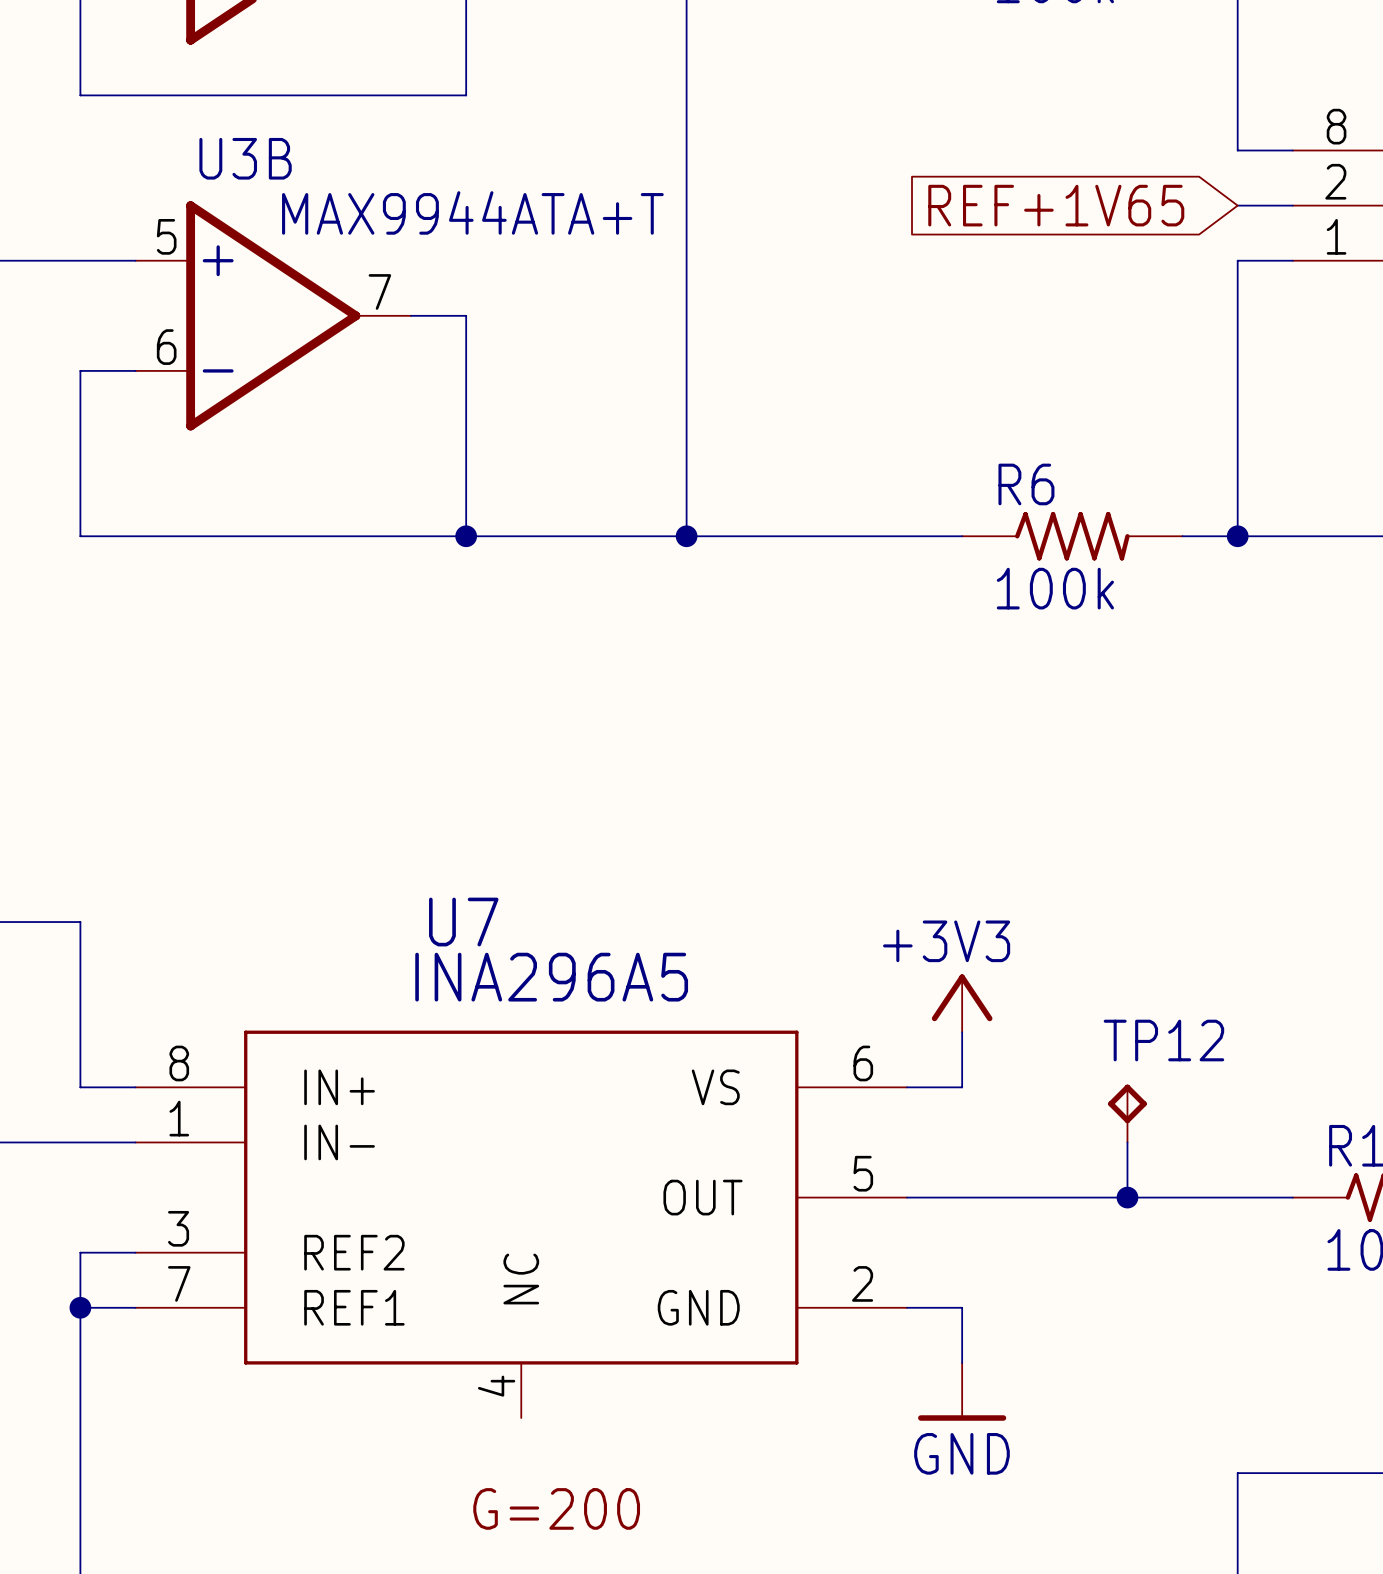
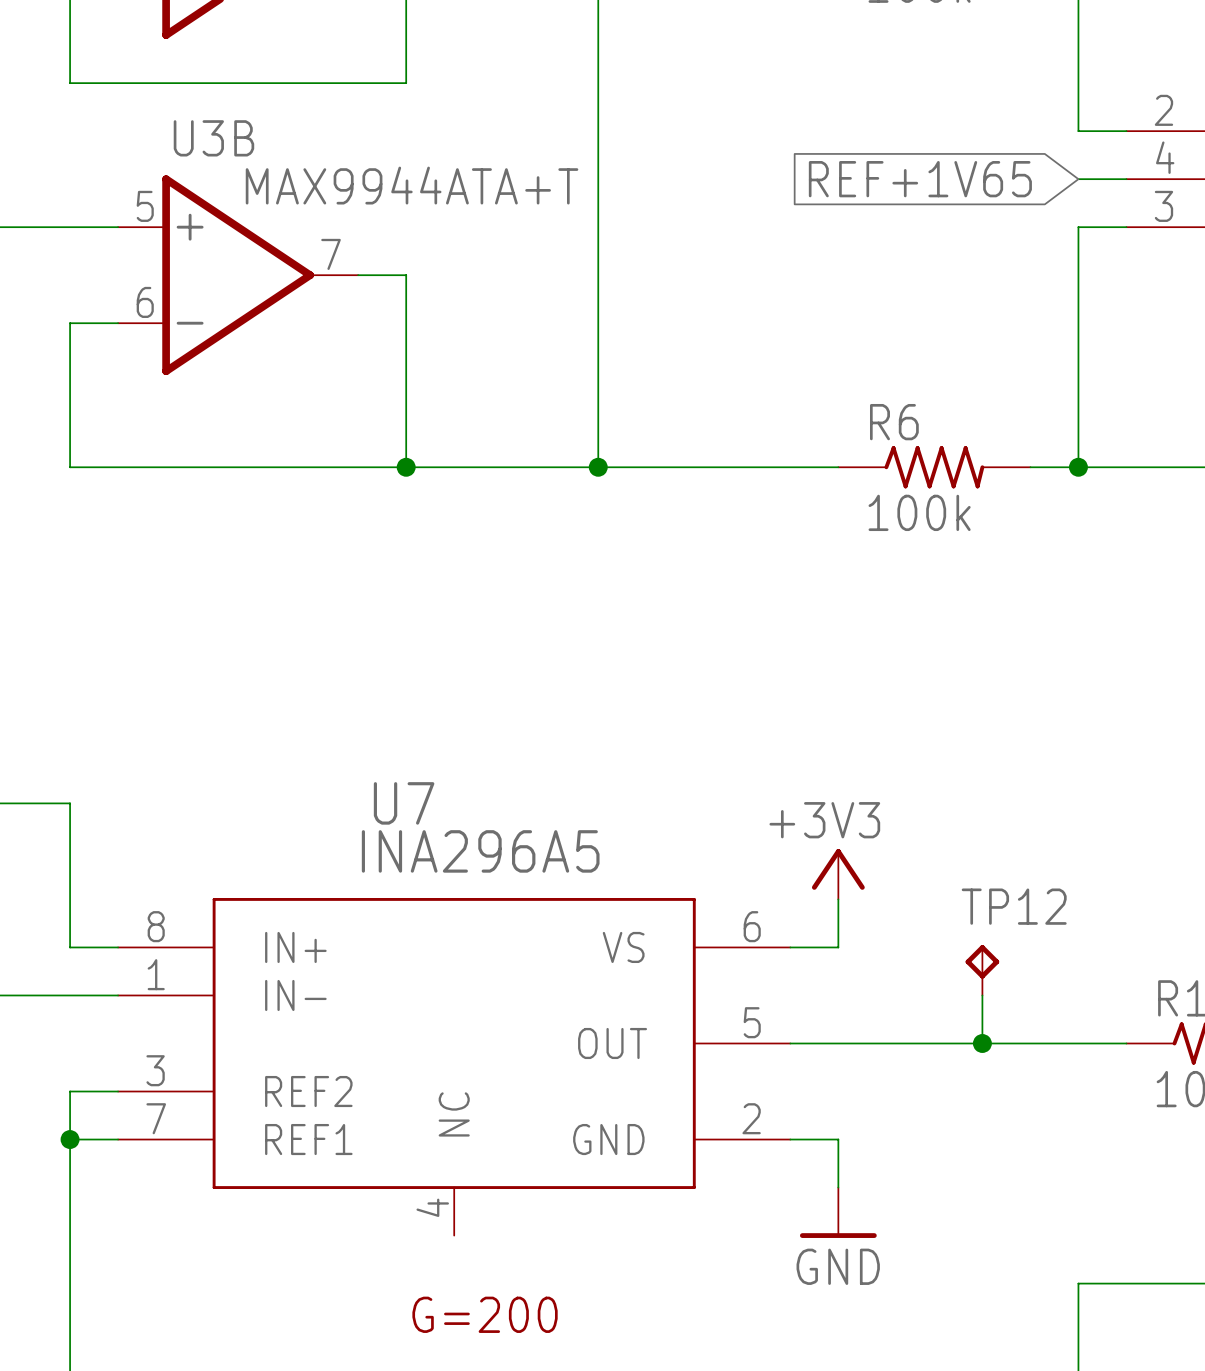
part pin number: 8 (1336, 126) -> 2 (1163, 110)
part pin number: 2 (1335, 181) -> 4 (1165, 157)
part pin number: 1 (1336, 236) -> 3 (1163, 206)

